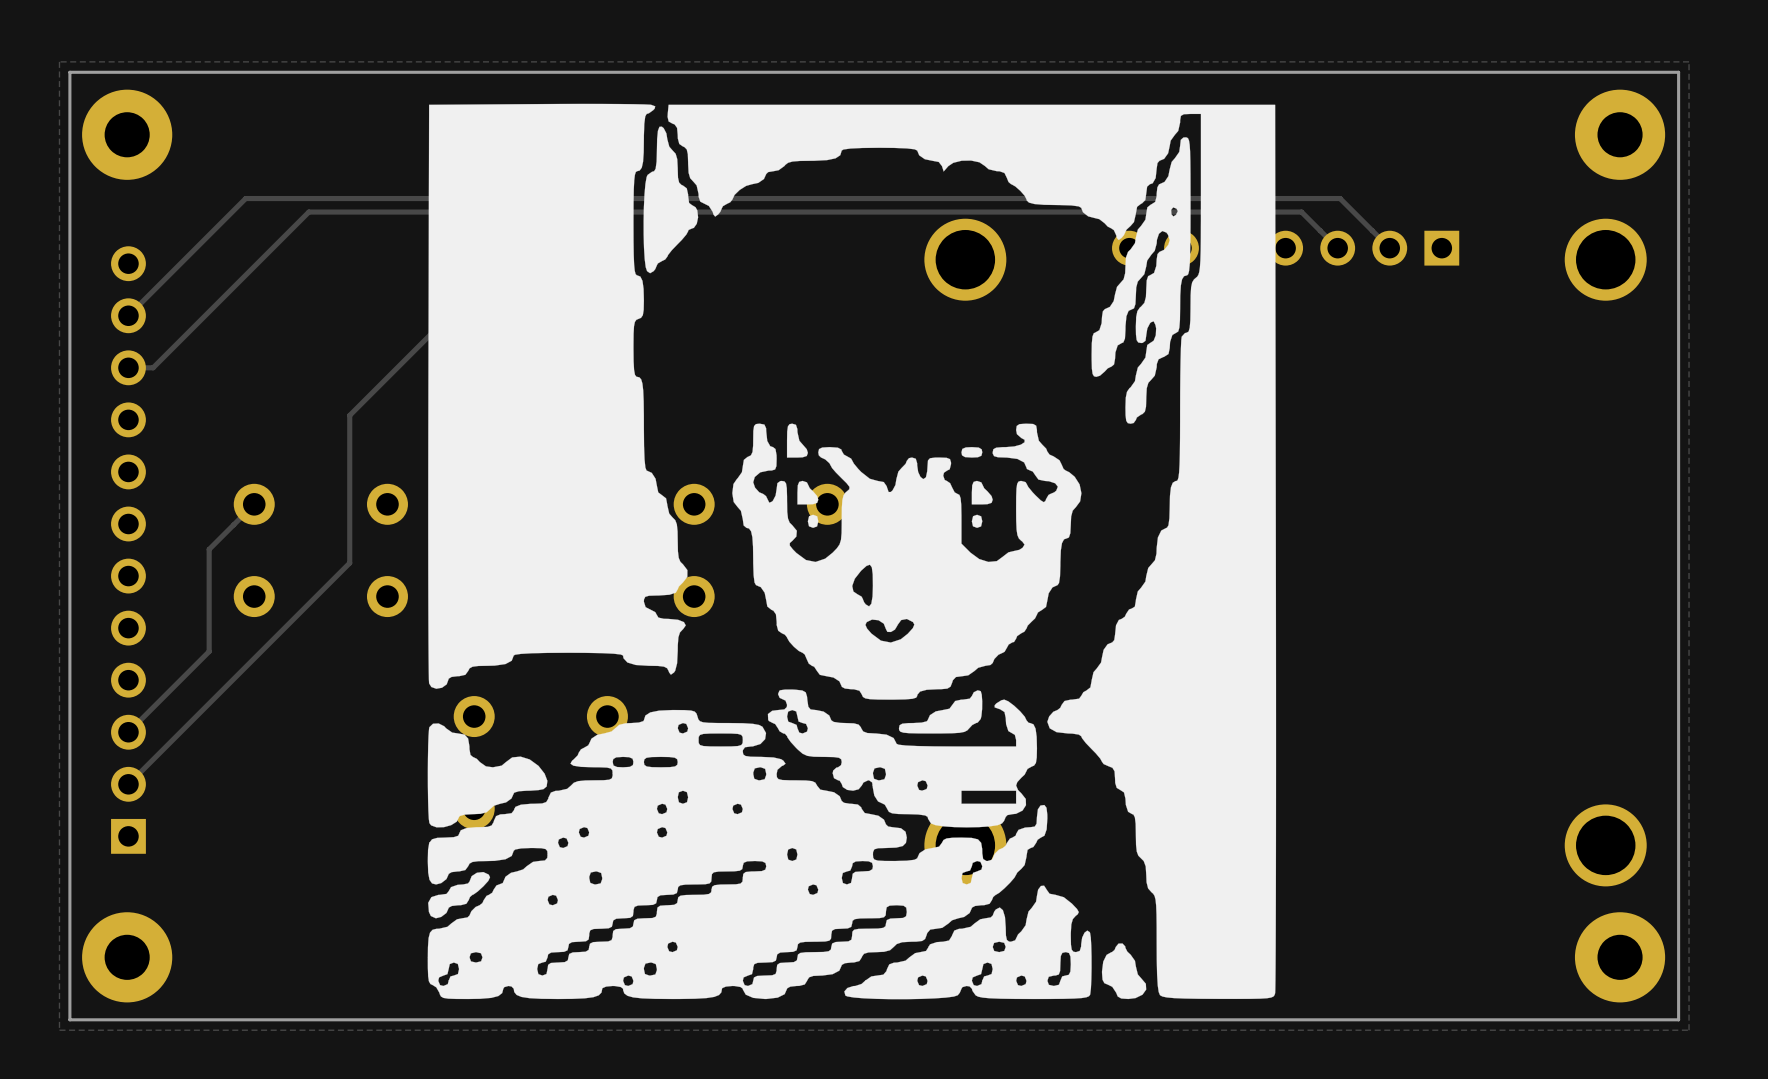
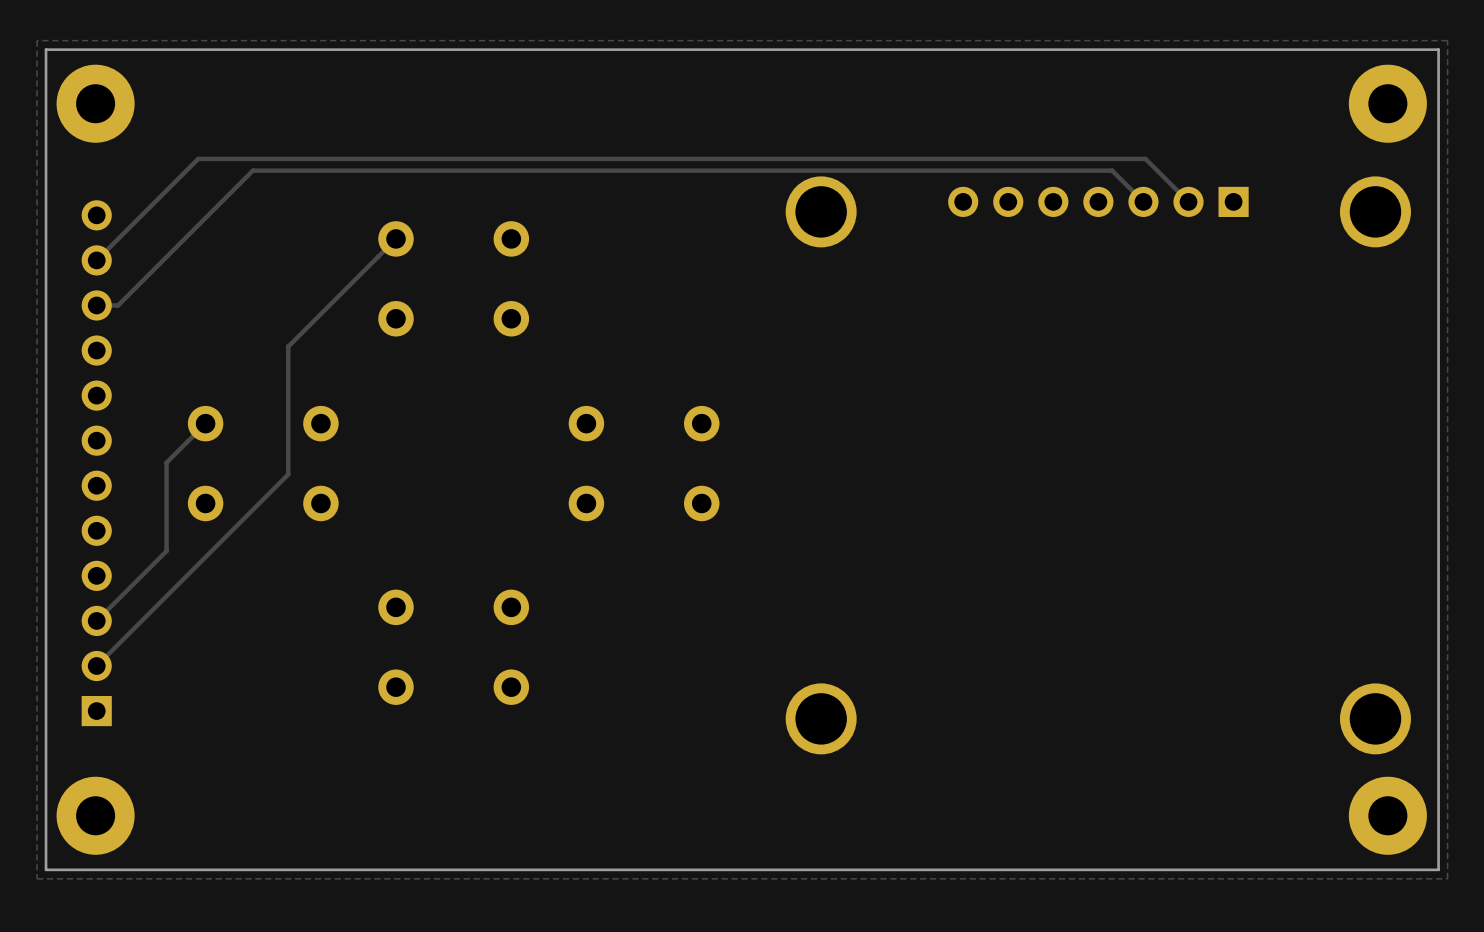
drawing: [427, 103, 1277, 1000] -> none

